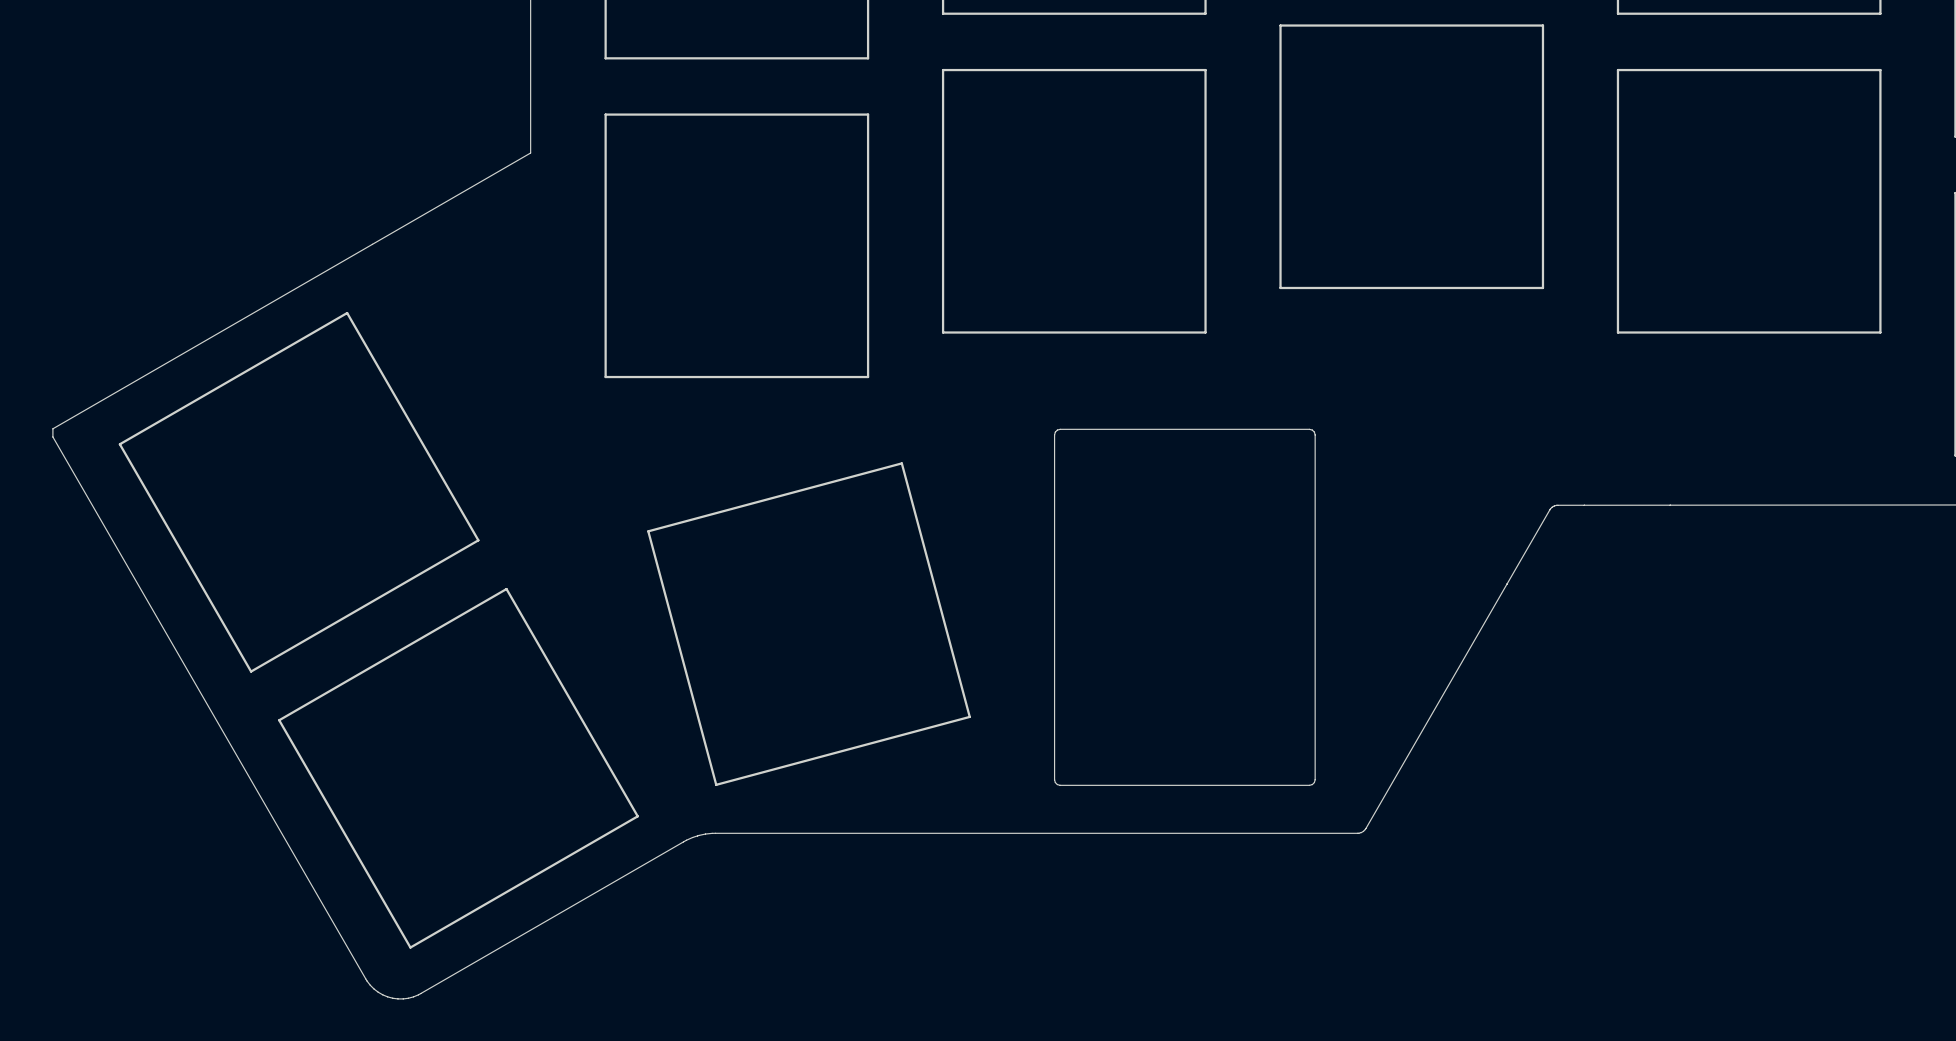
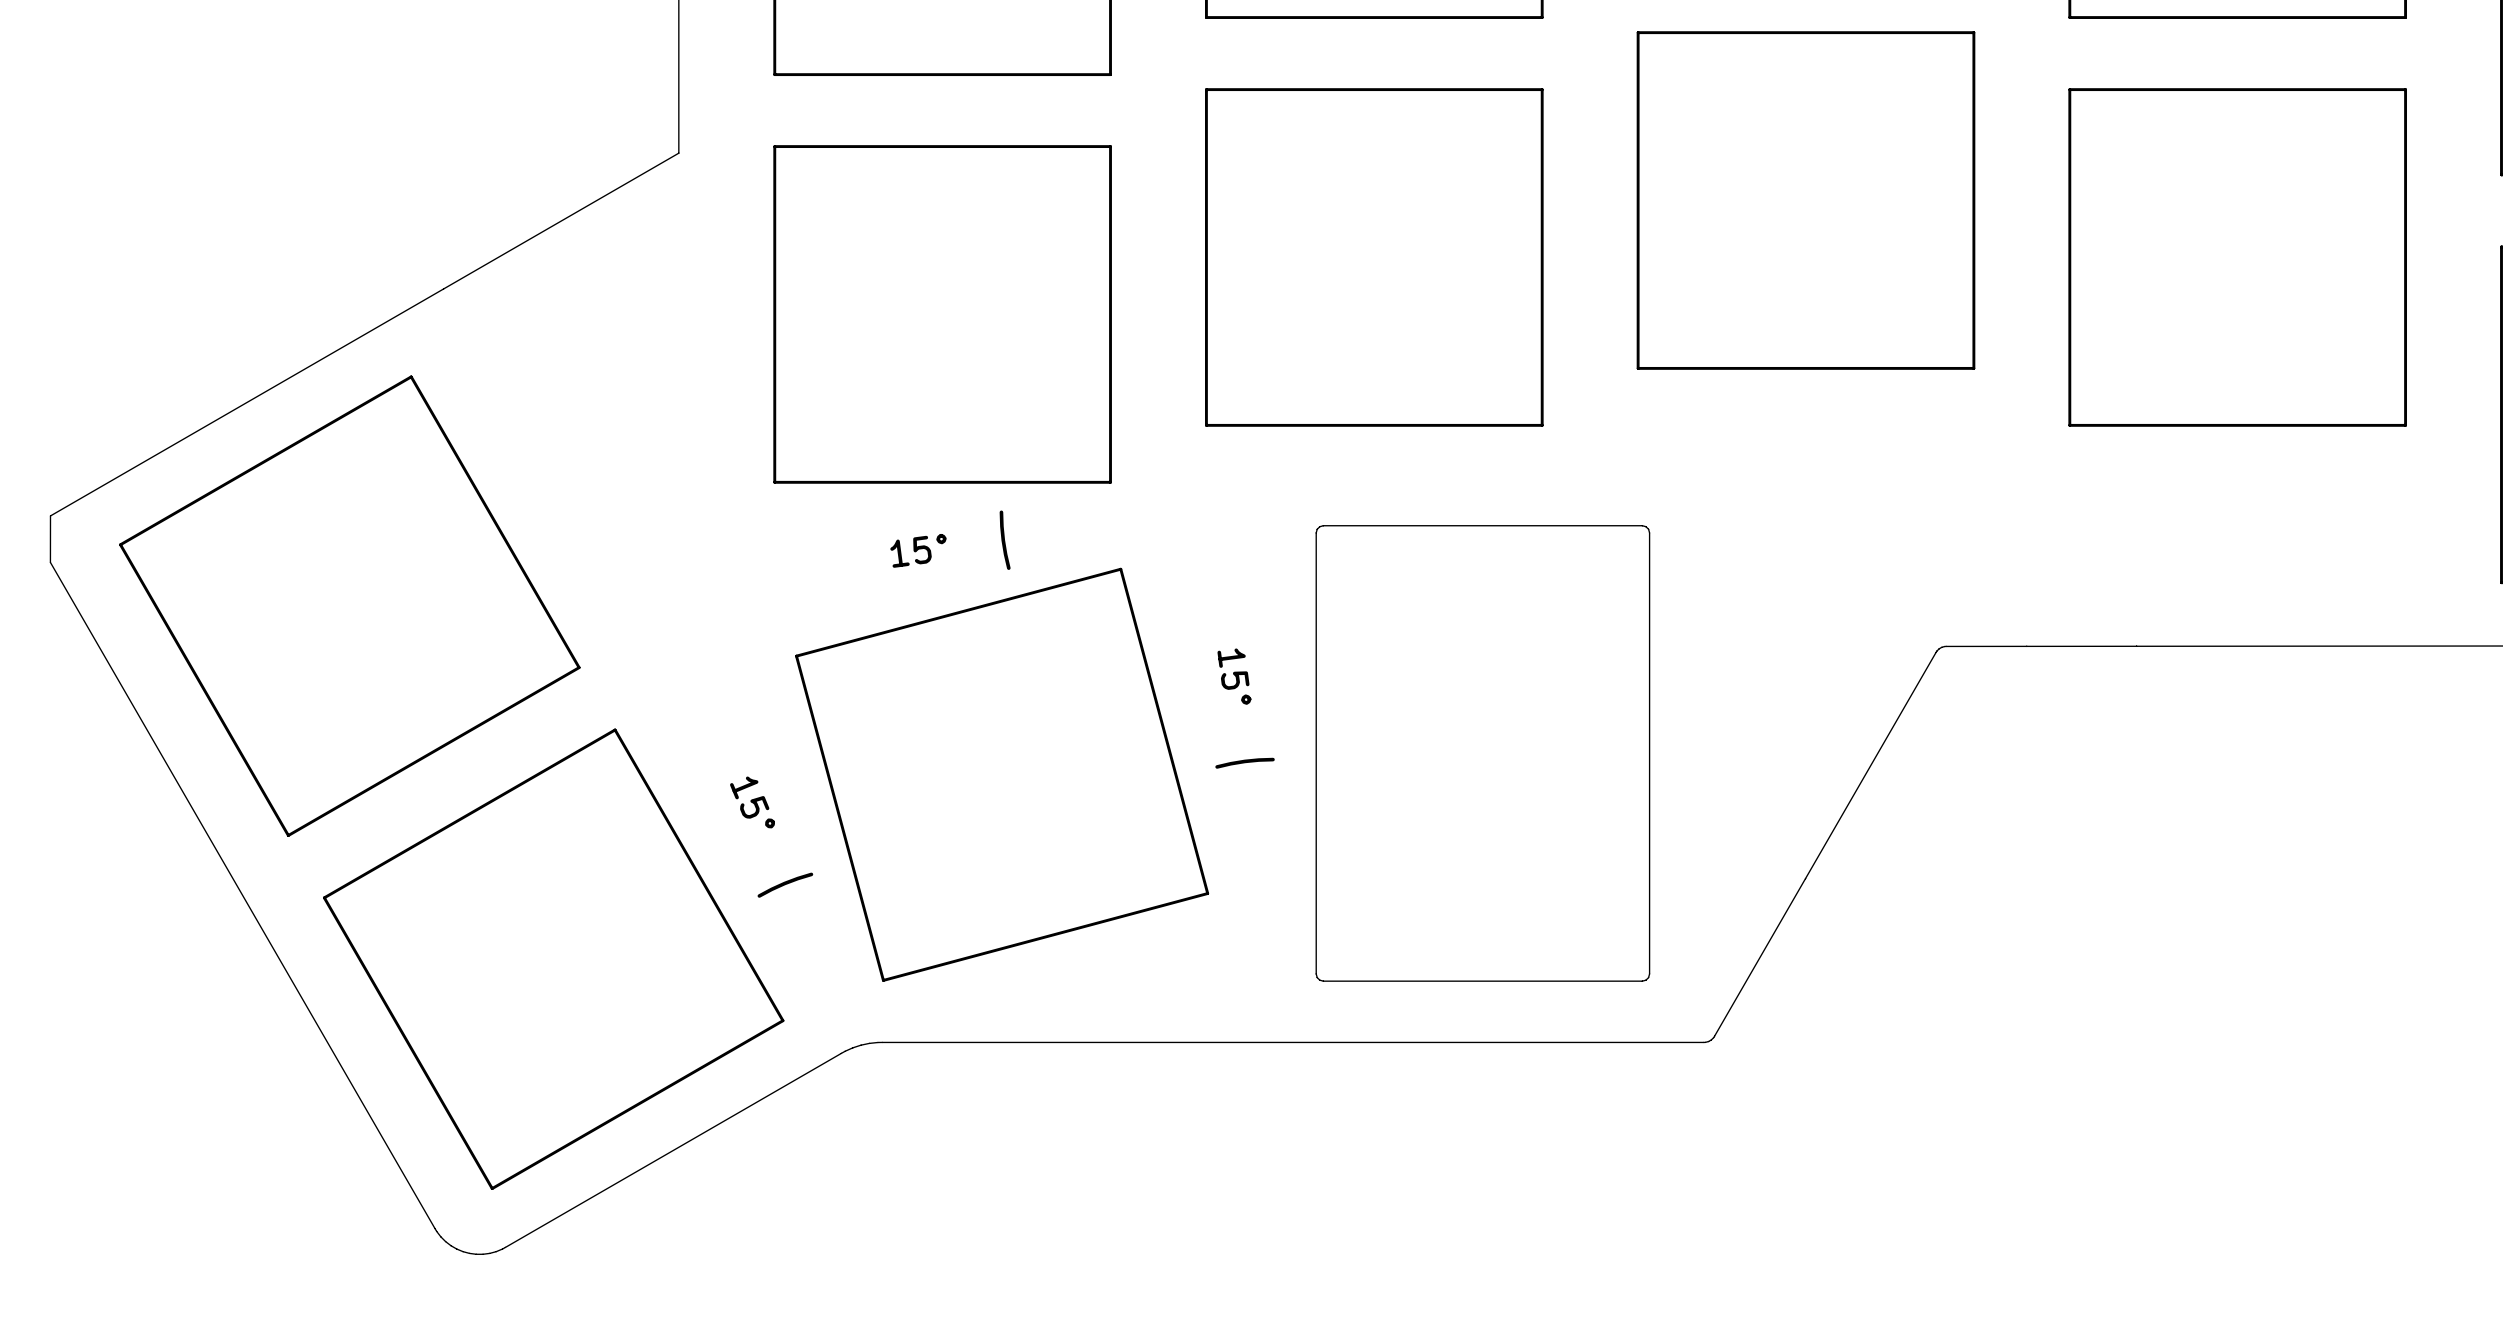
board edge: (530, 119) (530, 152) (52, 428) (52, 437) (365, 978) (374, 988) (387, 996) (403, 998) (418, 994) (683, 841) (705, 834) (1361, 832) (1365, 828) (1549, 509) (1557, 505) -> (678, 153) (50, 515) (50, 562) (436, 1231) (445, 1241) (463, 1251) (483, 1254) (502, 1249) (845, 1051) (869, 1043) (1708, 1041) (1714, 1036) (1936, 651) (1944, 646) (1992, 646)
line: none -> (1001, 512) (1003, 540) (1008, 568)
board edge: (1060, 429) (1054, 434) (1055, 782) (1060, 785) (1312, 784) (1315, 779) (1314, 432) (1309, 429) (1060, 429) -> (1323, 525) (1319, 526) (1316, 532) (1317, 977) (1323, 981) (1645, 980) (1649, 973) (1648, 529) (1642, 525) (1323, 525)
text: none -> 15° (918, 550)
drawing position: (299, 492) -> (349, 606)
text: none -> 15° (1234, 676)
line: none -> (1273, 759) (1244, 761) (1217, 766)
drawing position: (809, 624) -> (1002, 774)
text: none -> 15° (752, 802)
line: none -> (811, 874) (784, 883) (759, 895)
drawing position: (458, 768) -> (553, 959)

